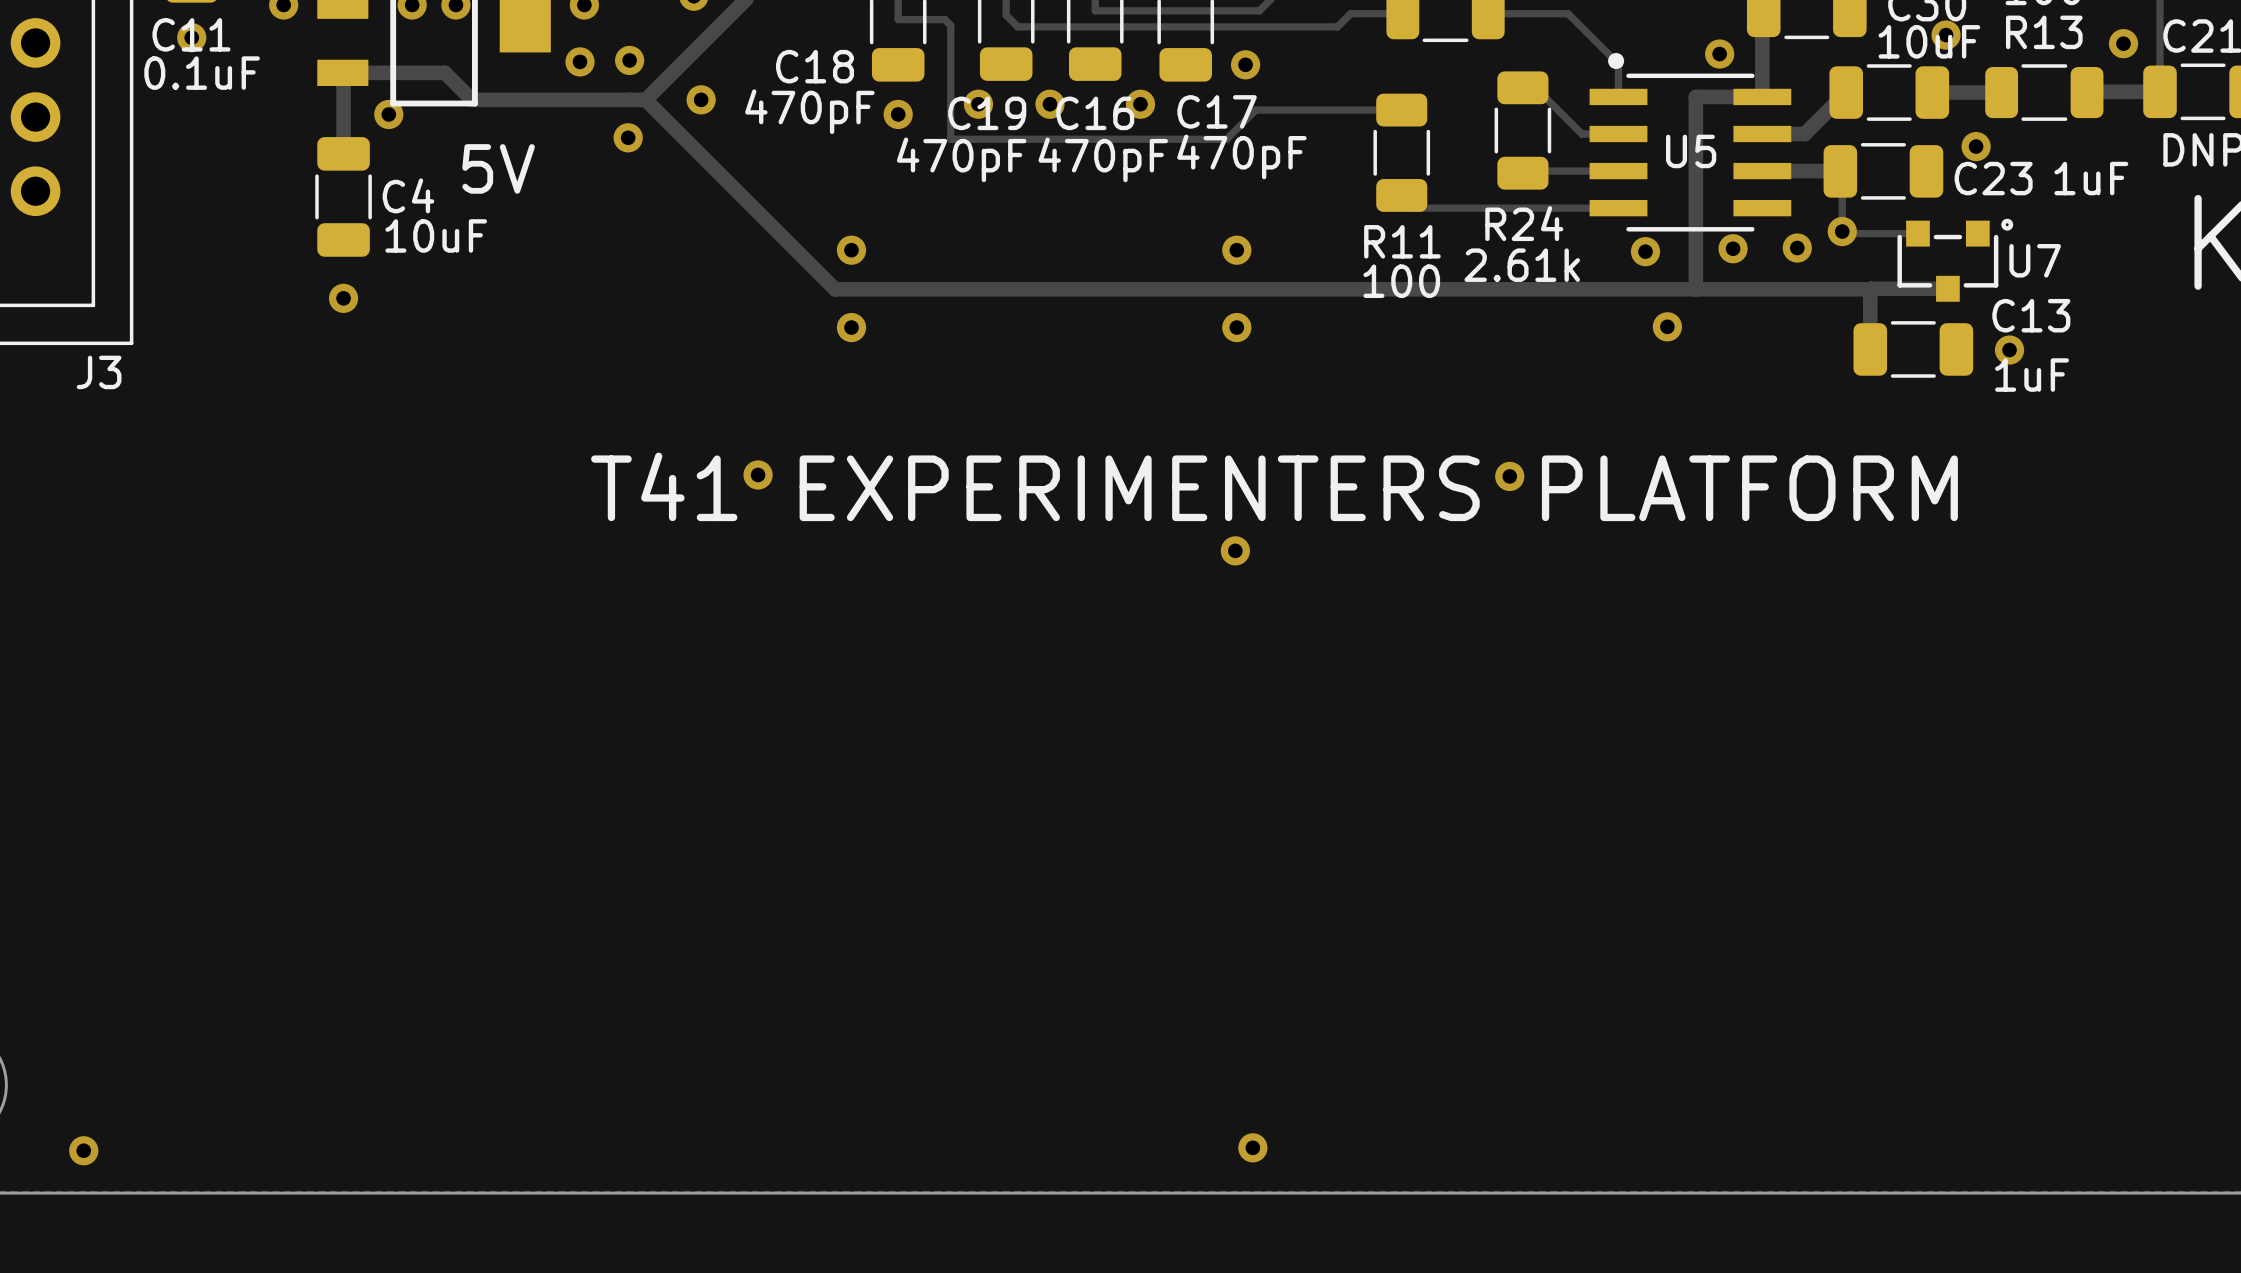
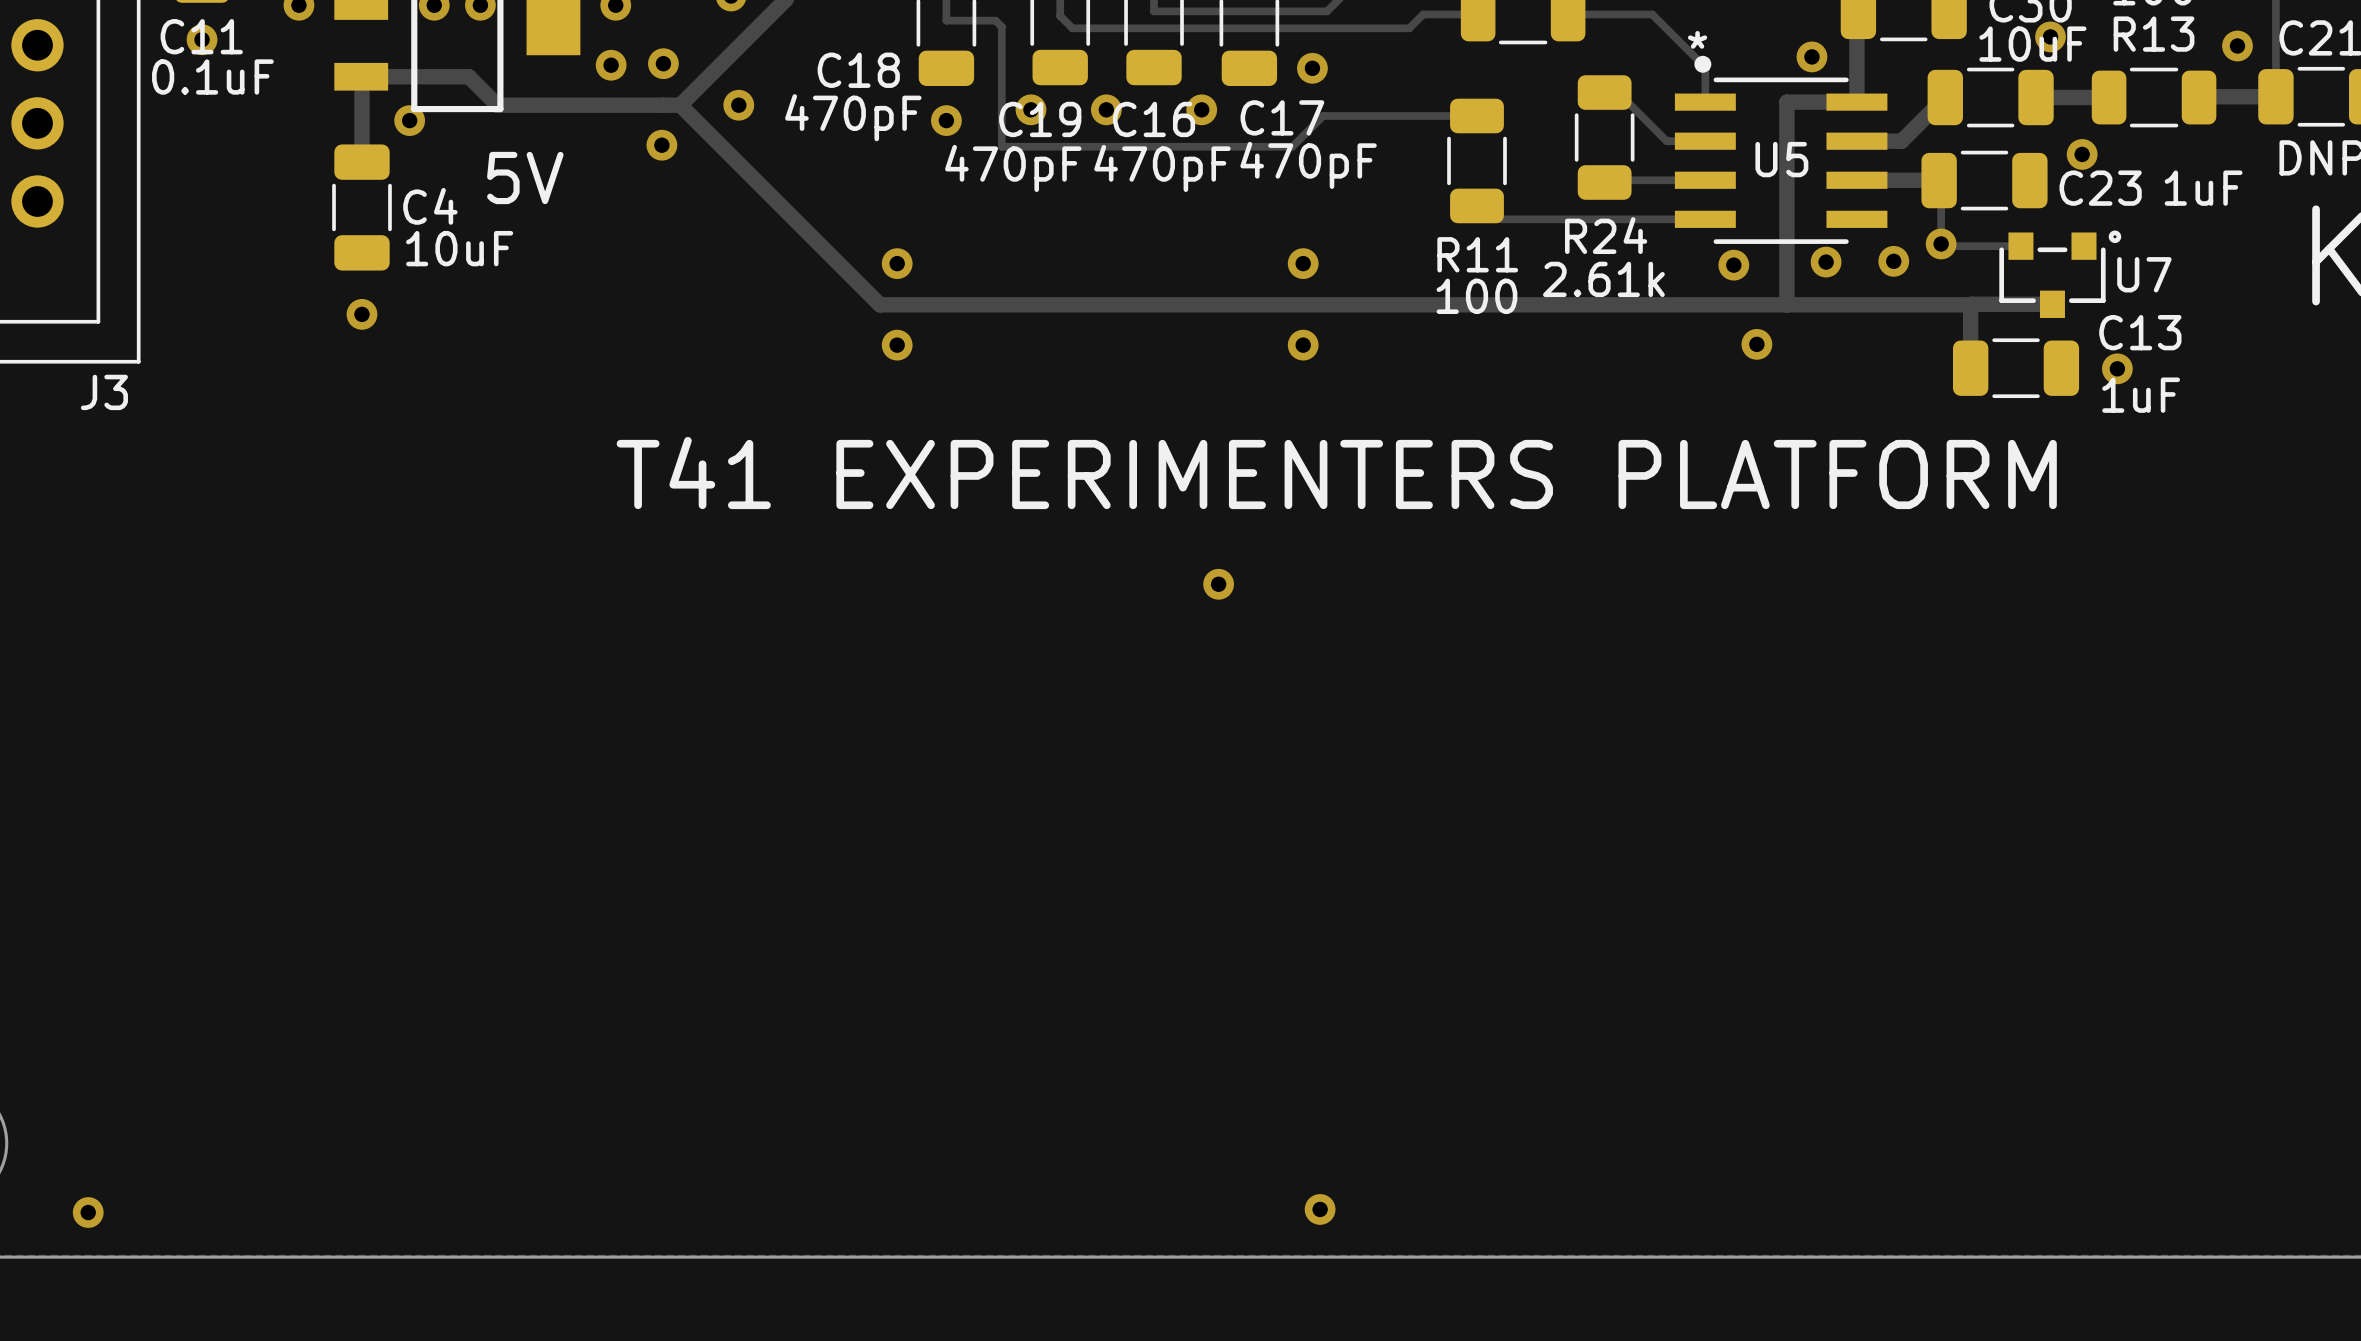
U5 text: none -> * (1697, 39)
via: (758, 474) -> none
via: (1509, 476) -> none
text position: T41 EXPERIMENTERS PLATFORM (1274, 486) -> T41 EXPERIMENTERS PLATFORM (1336, 473)
via position: (1235, 550) -> (1218, 584)

